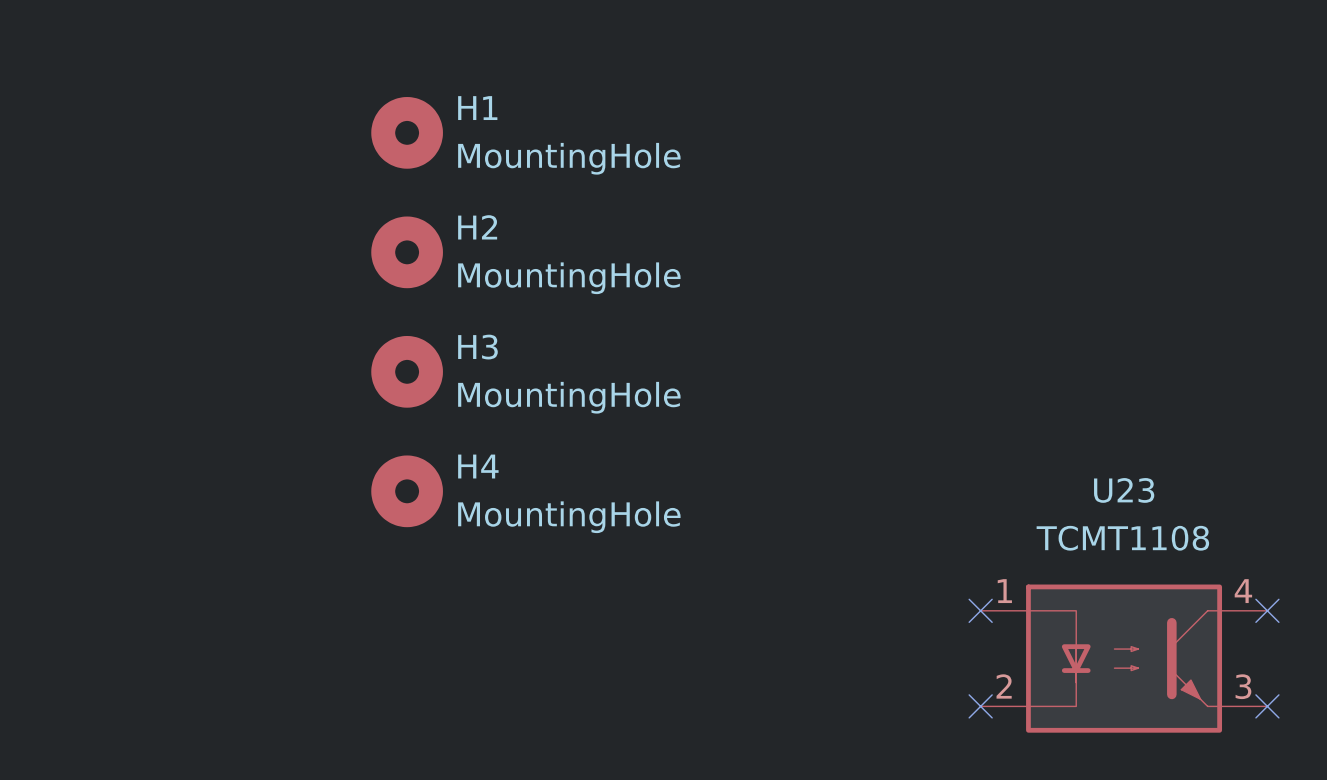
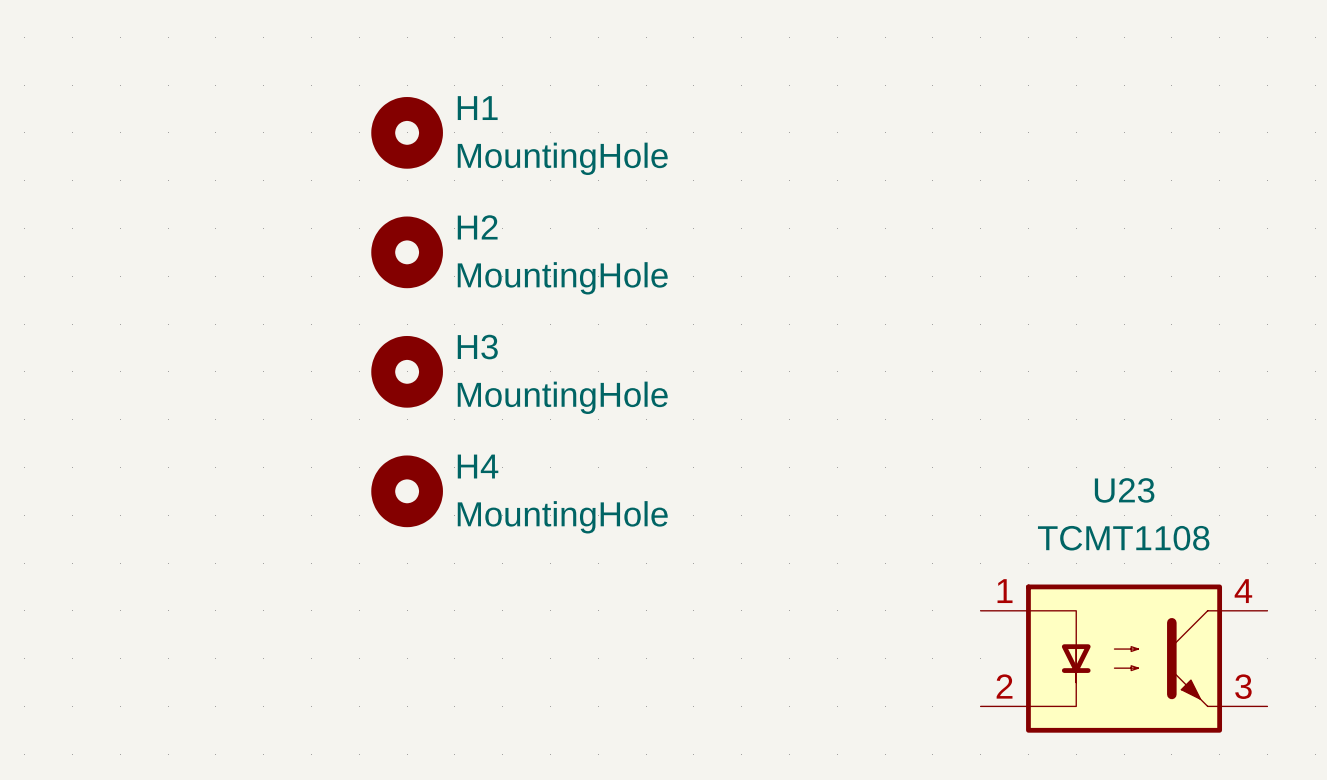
no-connect mark: (980, 610) -> none
no-connect mark: (1267, 610) -> none
no-connect mark: (980, 706) -> none
no-connect mark: (1267, 706) -> none

